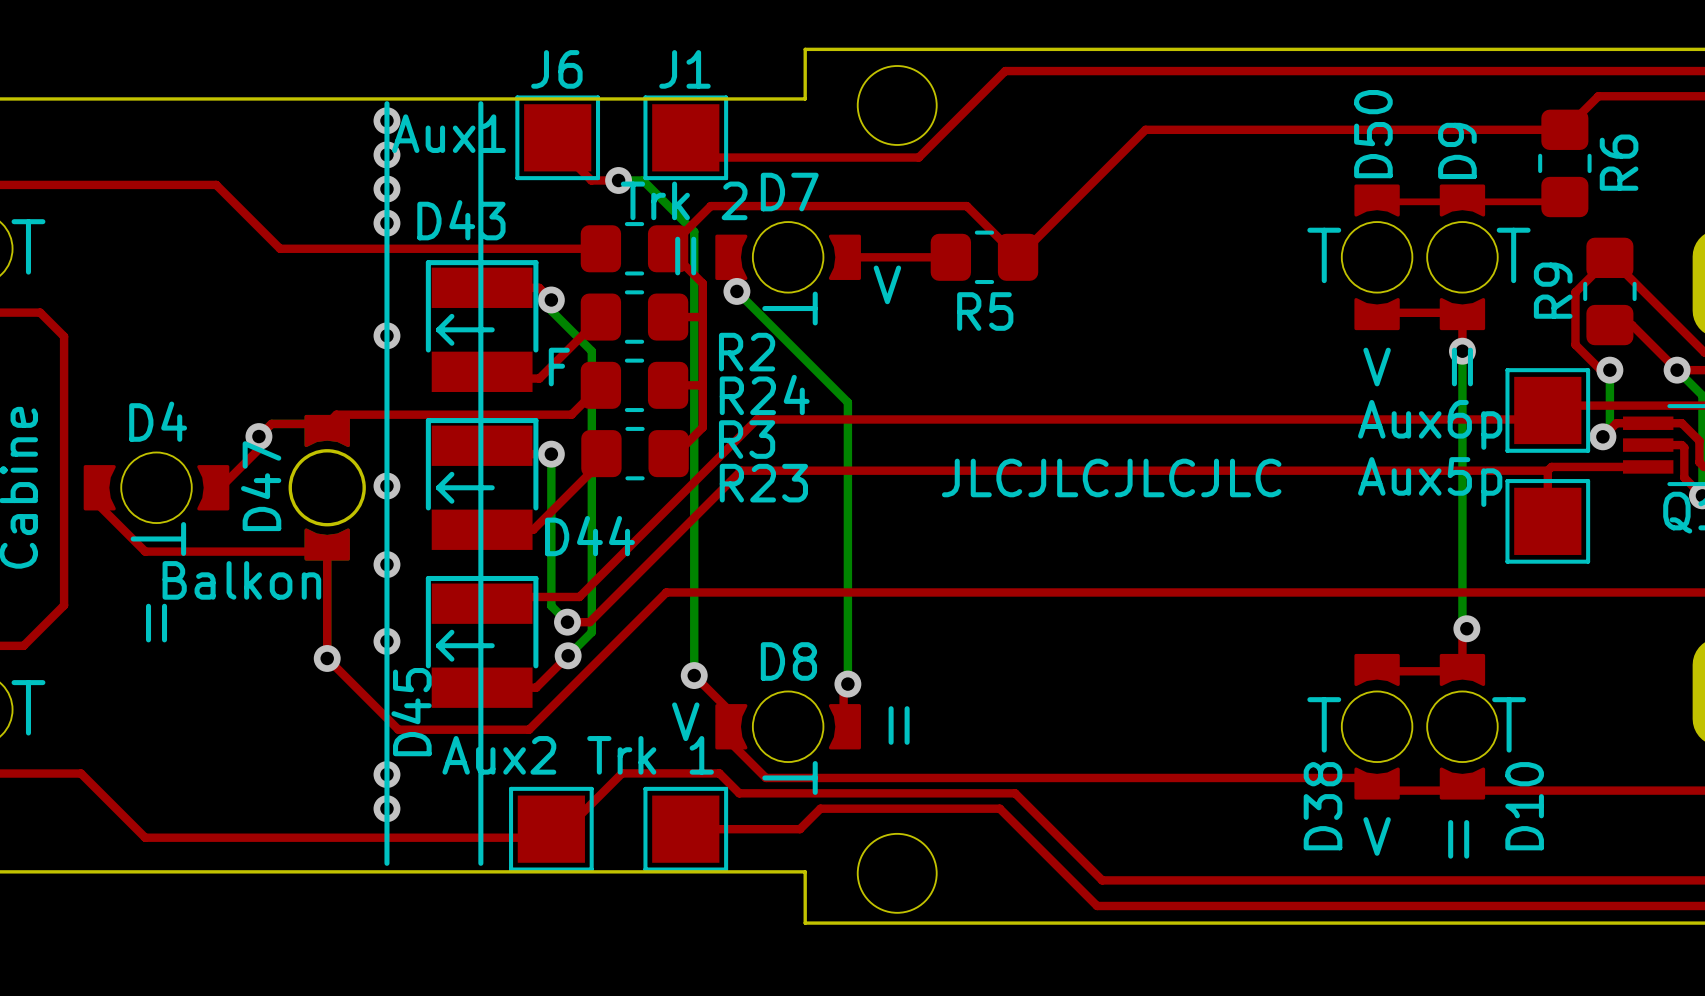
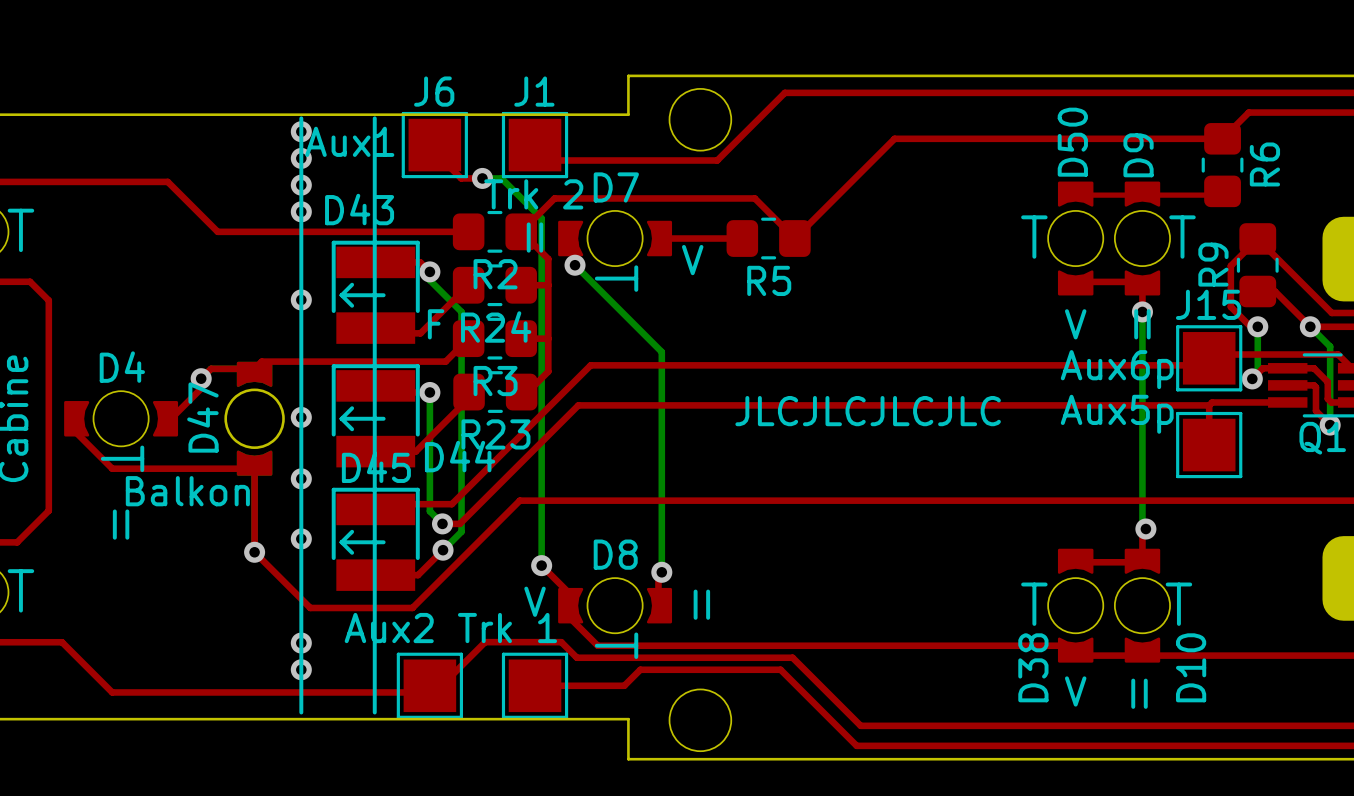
J15 name: none -> J15 (1208, 304)
R2 name position: R2 (747, 352) -> R2 (495, 274)
R24 name position: R24 (764, 394) -> R24 (496, 327)
R3 name position: R3 (747, 439) -> R3 (495, 381)
R23 name position: R23 (763, 483) -> R23 (495, 434)
D45 name rotation: 0° (411, 712) -> 90° clockwise (376, 467)
D45 name position: D45 (411, 712) -> D45 (376, 467)

